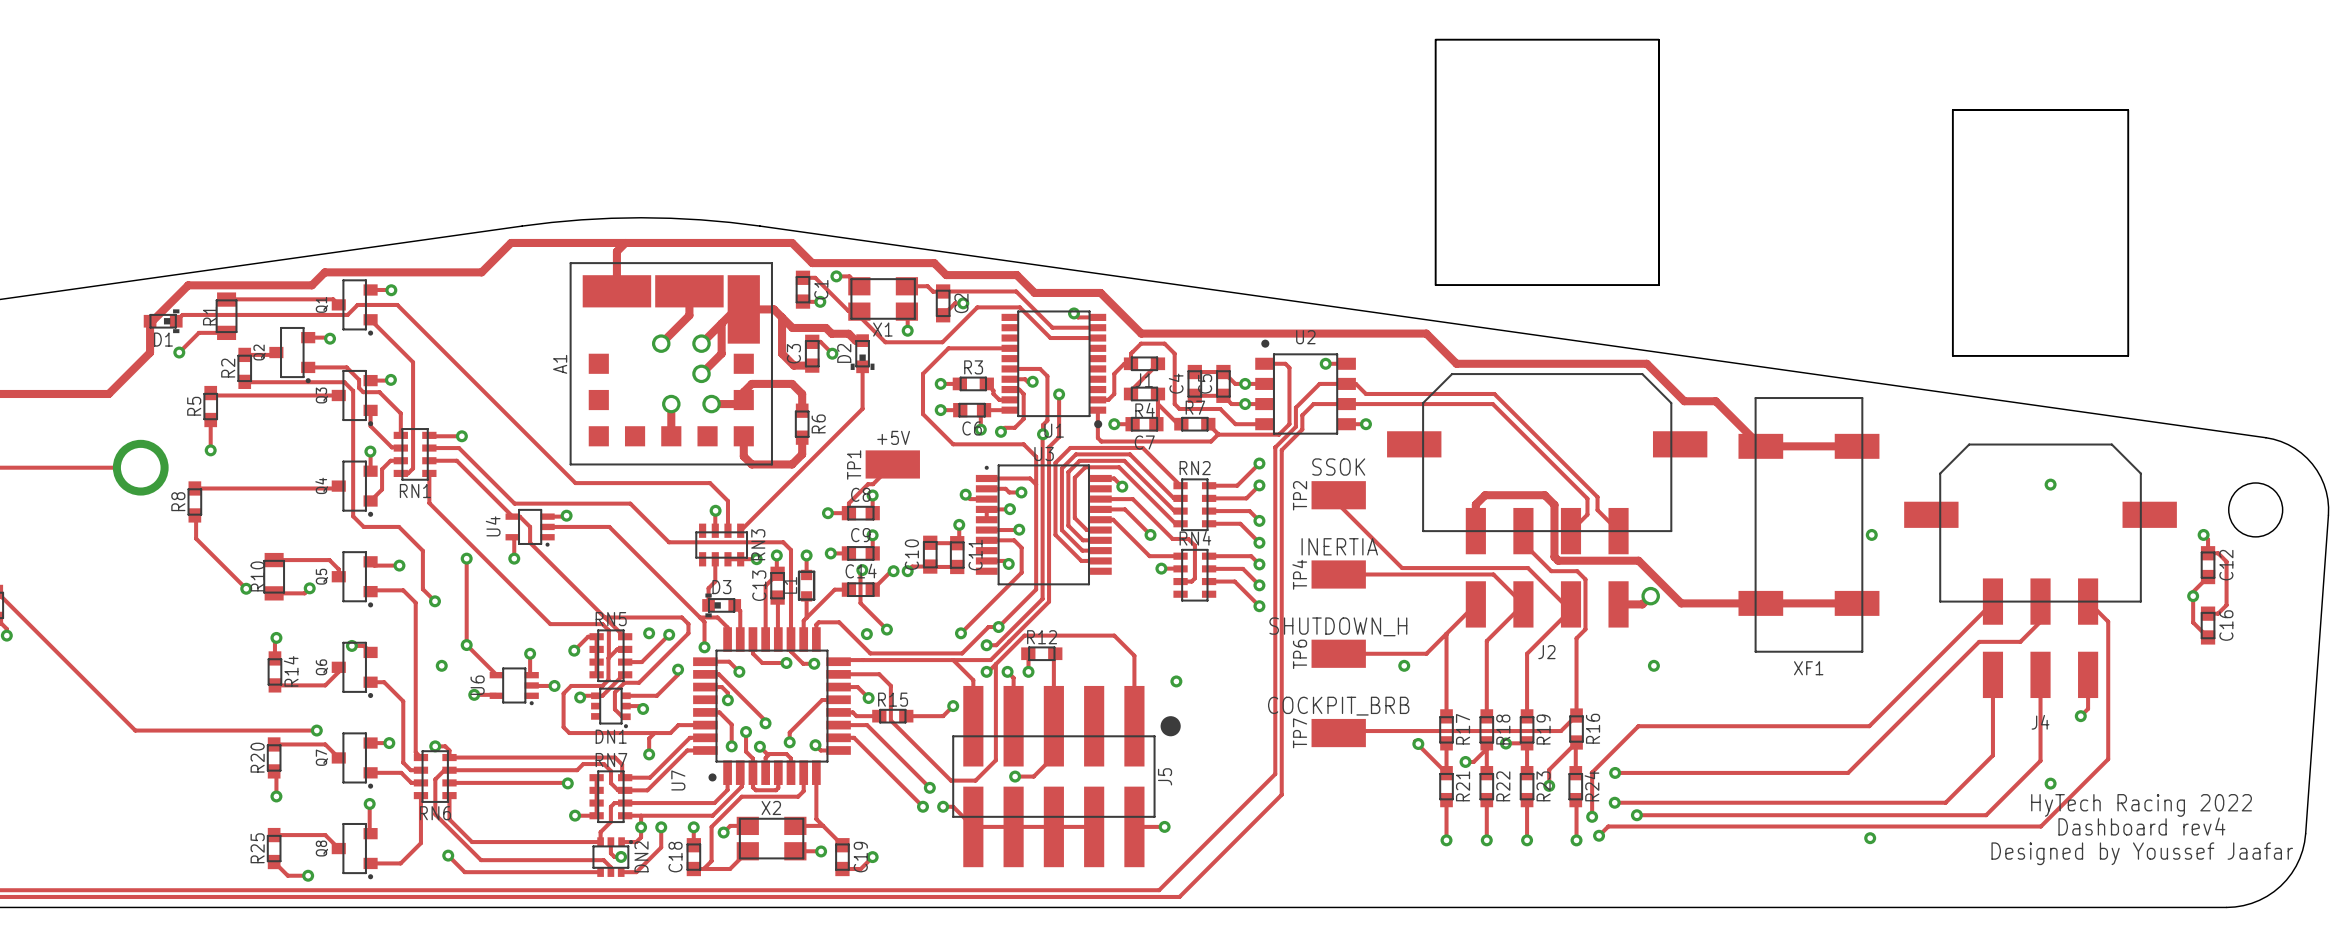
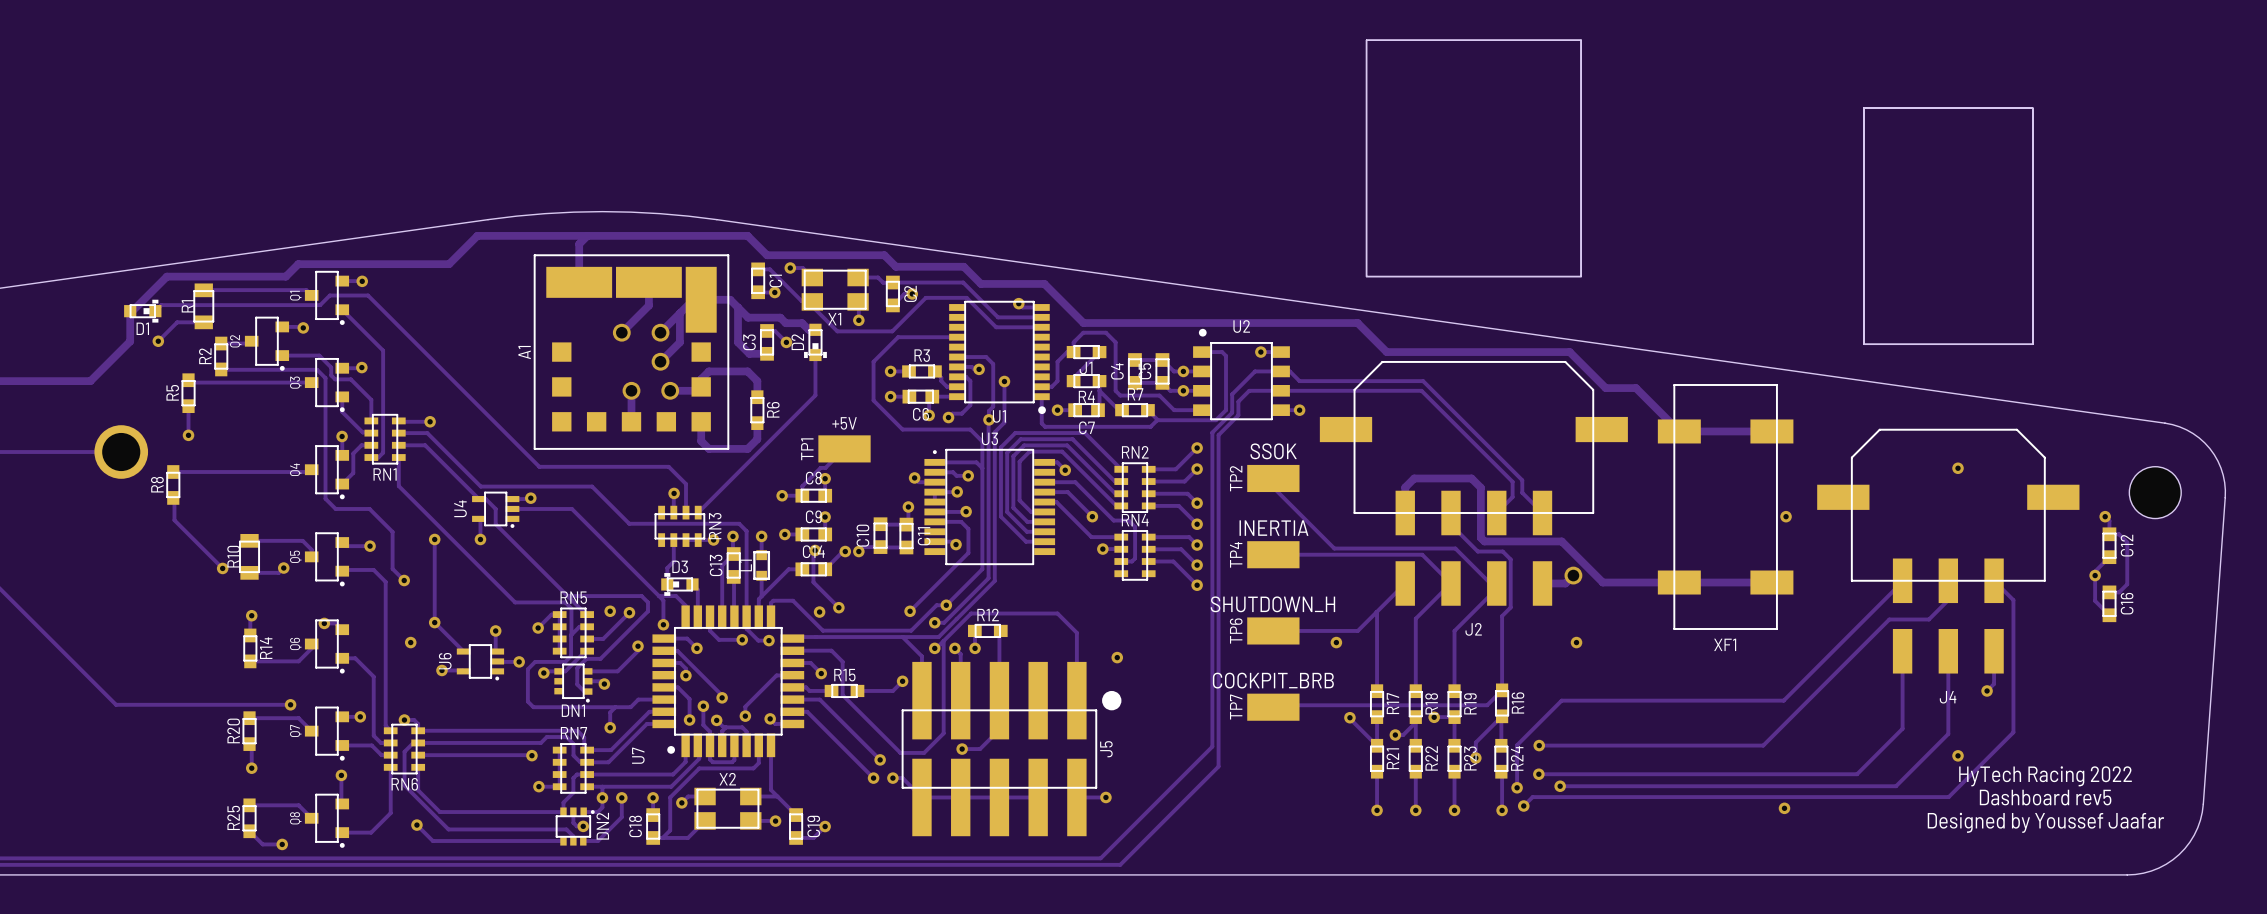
text: Dashboard rev4 (2141, 826) -> Dashboard rev5 (2045, 797)

